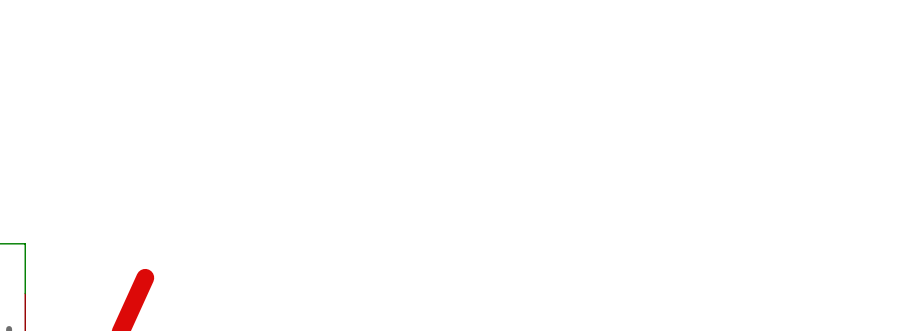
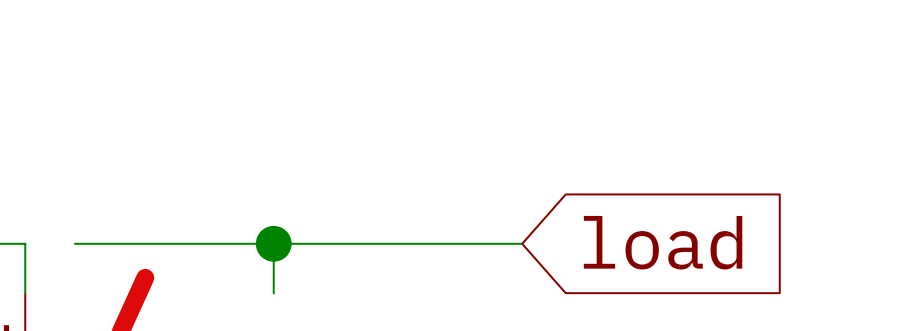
wire: none -> (74, 243) (522, 243)
wire: none -> (273, 243) (273, 293)
junction: none -> (273, 243)
global label: none -> load (663, 242)

